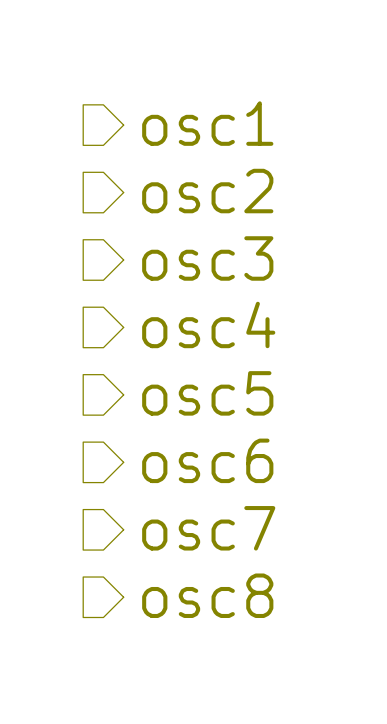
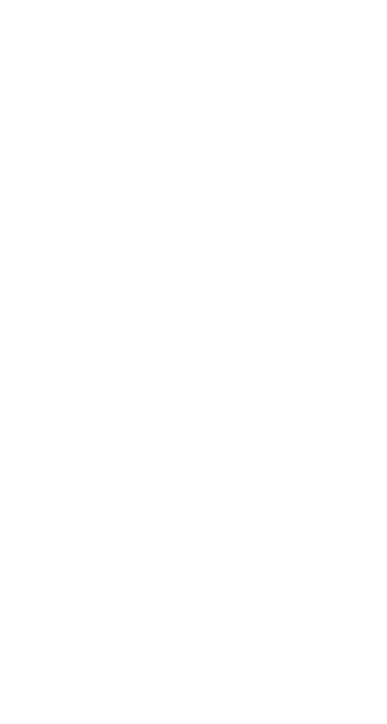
hierarchical label: osc1 (207, 123) -> none
hierarchical label: osc2 (207, 191) -> none
hierarchical label: osc3 (207, 258) -> none
hierarchical label: osc4 (208, 324) -> none
hierarchical label: osc5 (207, 393) -> none
hierarchical label: osc6 (207, 460) -> none
hierarchical label: osc7 (208, 528) -> none
hierarchical label: osc8 (207, 595) -> none

